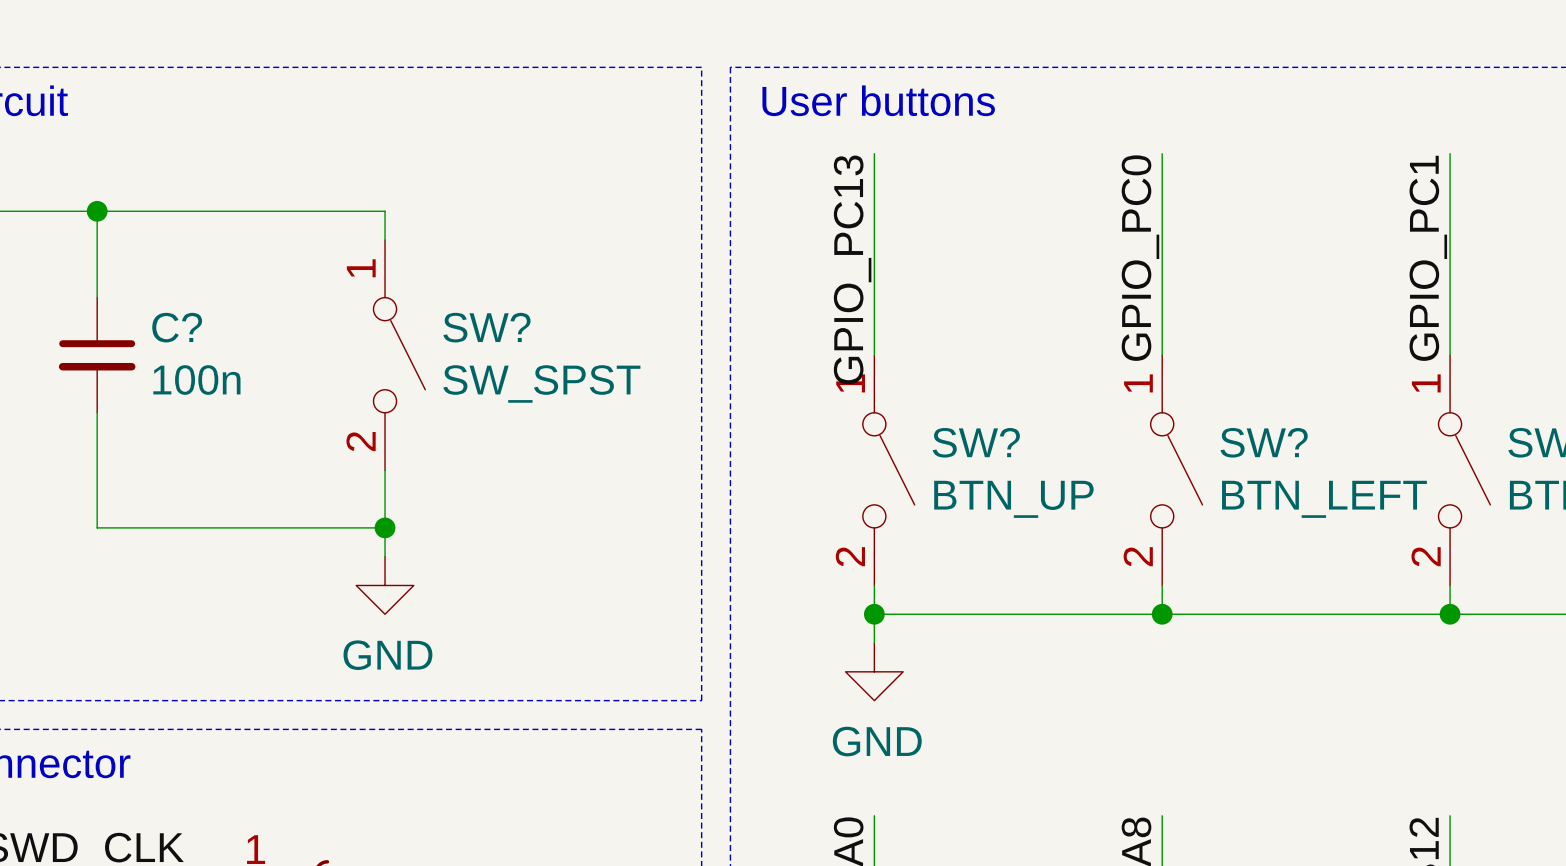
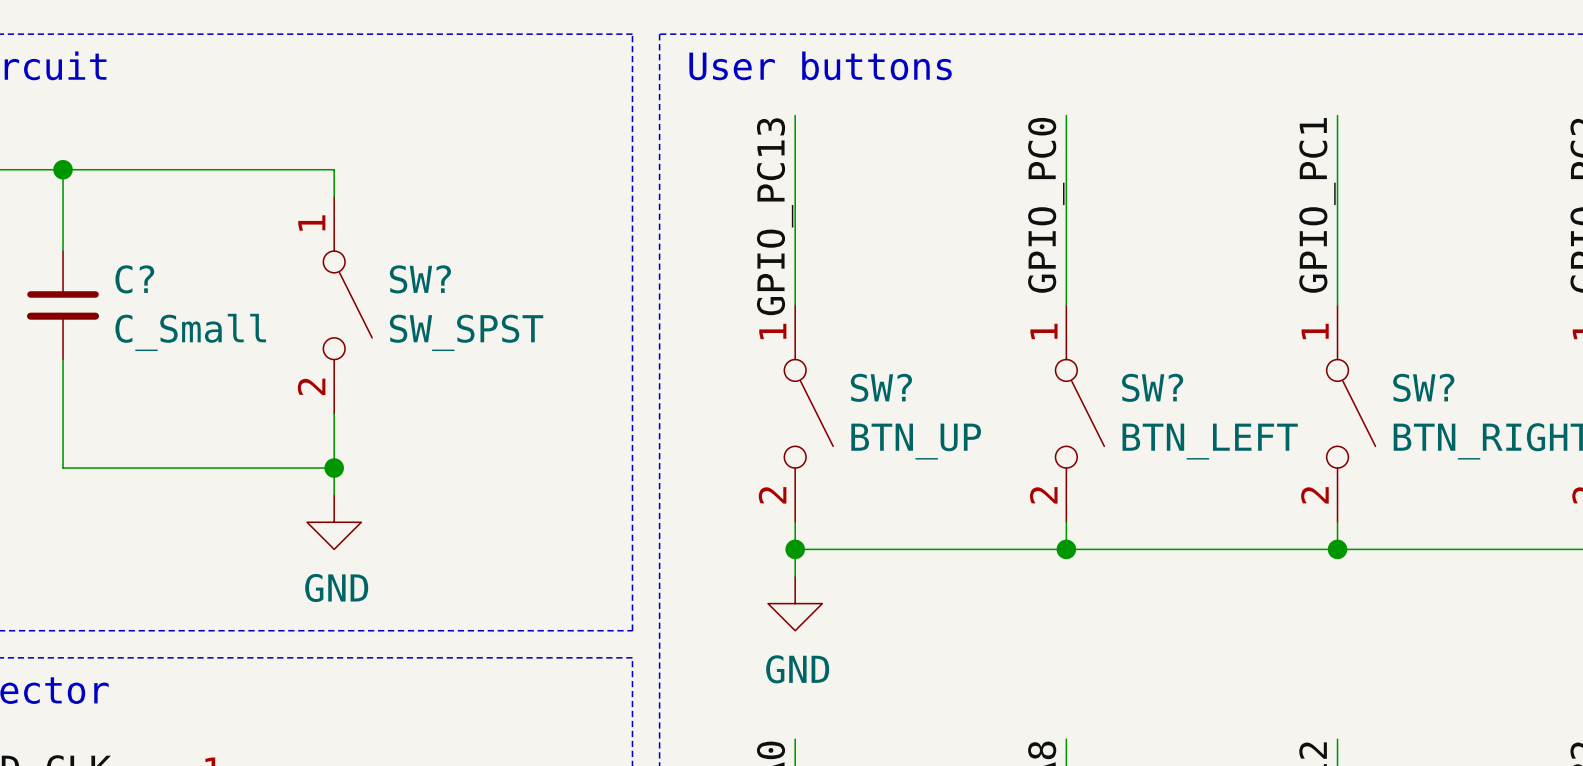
C? value: 100n (196, 380) -> C_Small (190, 332)

